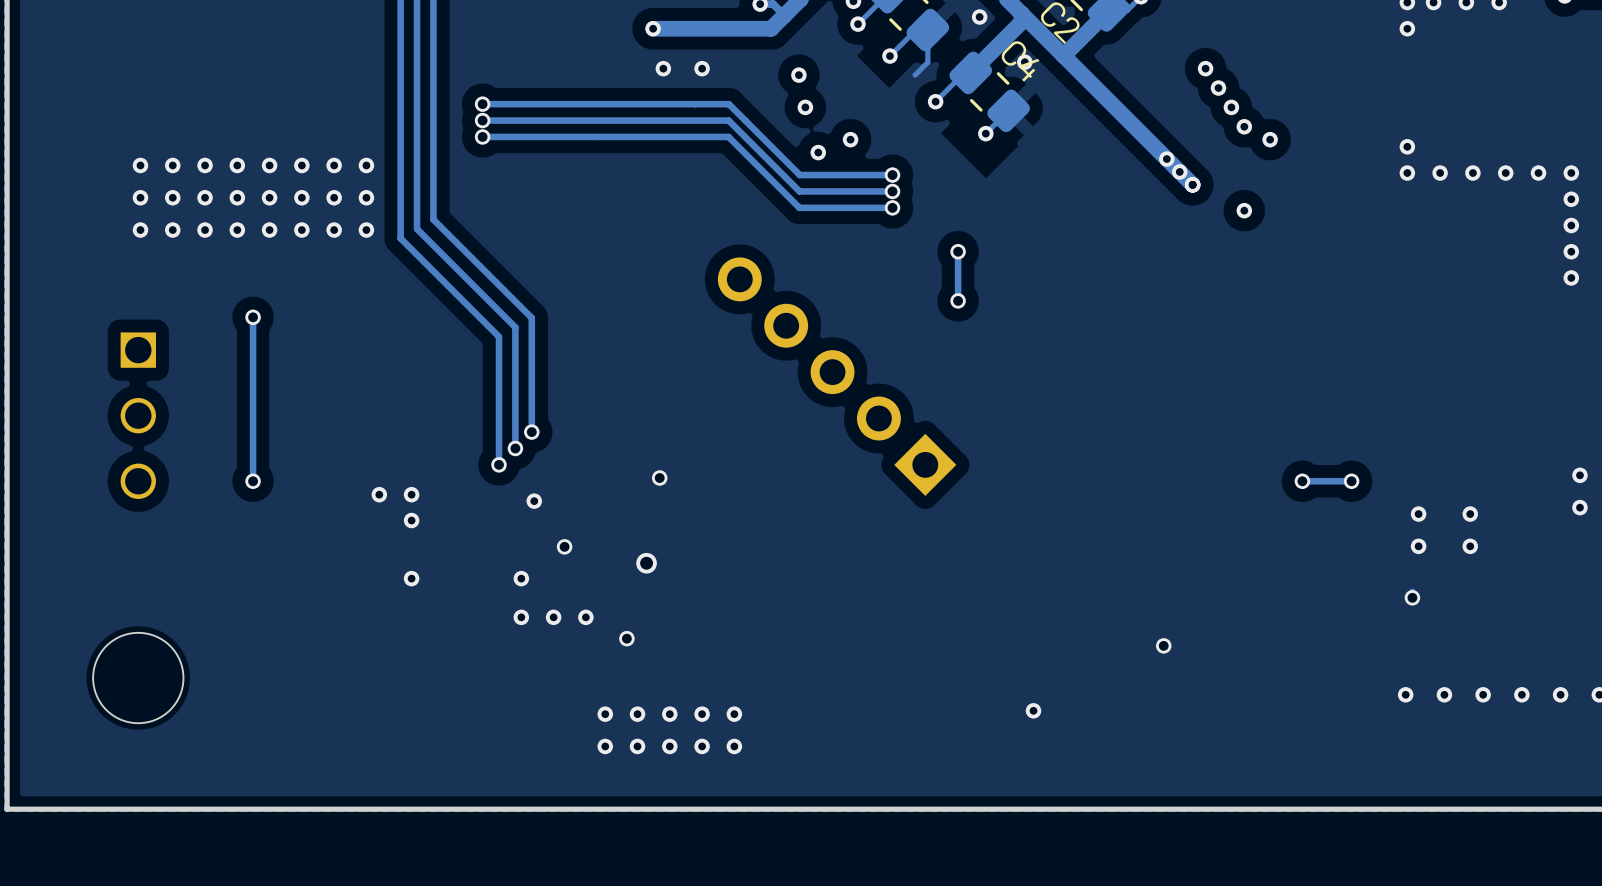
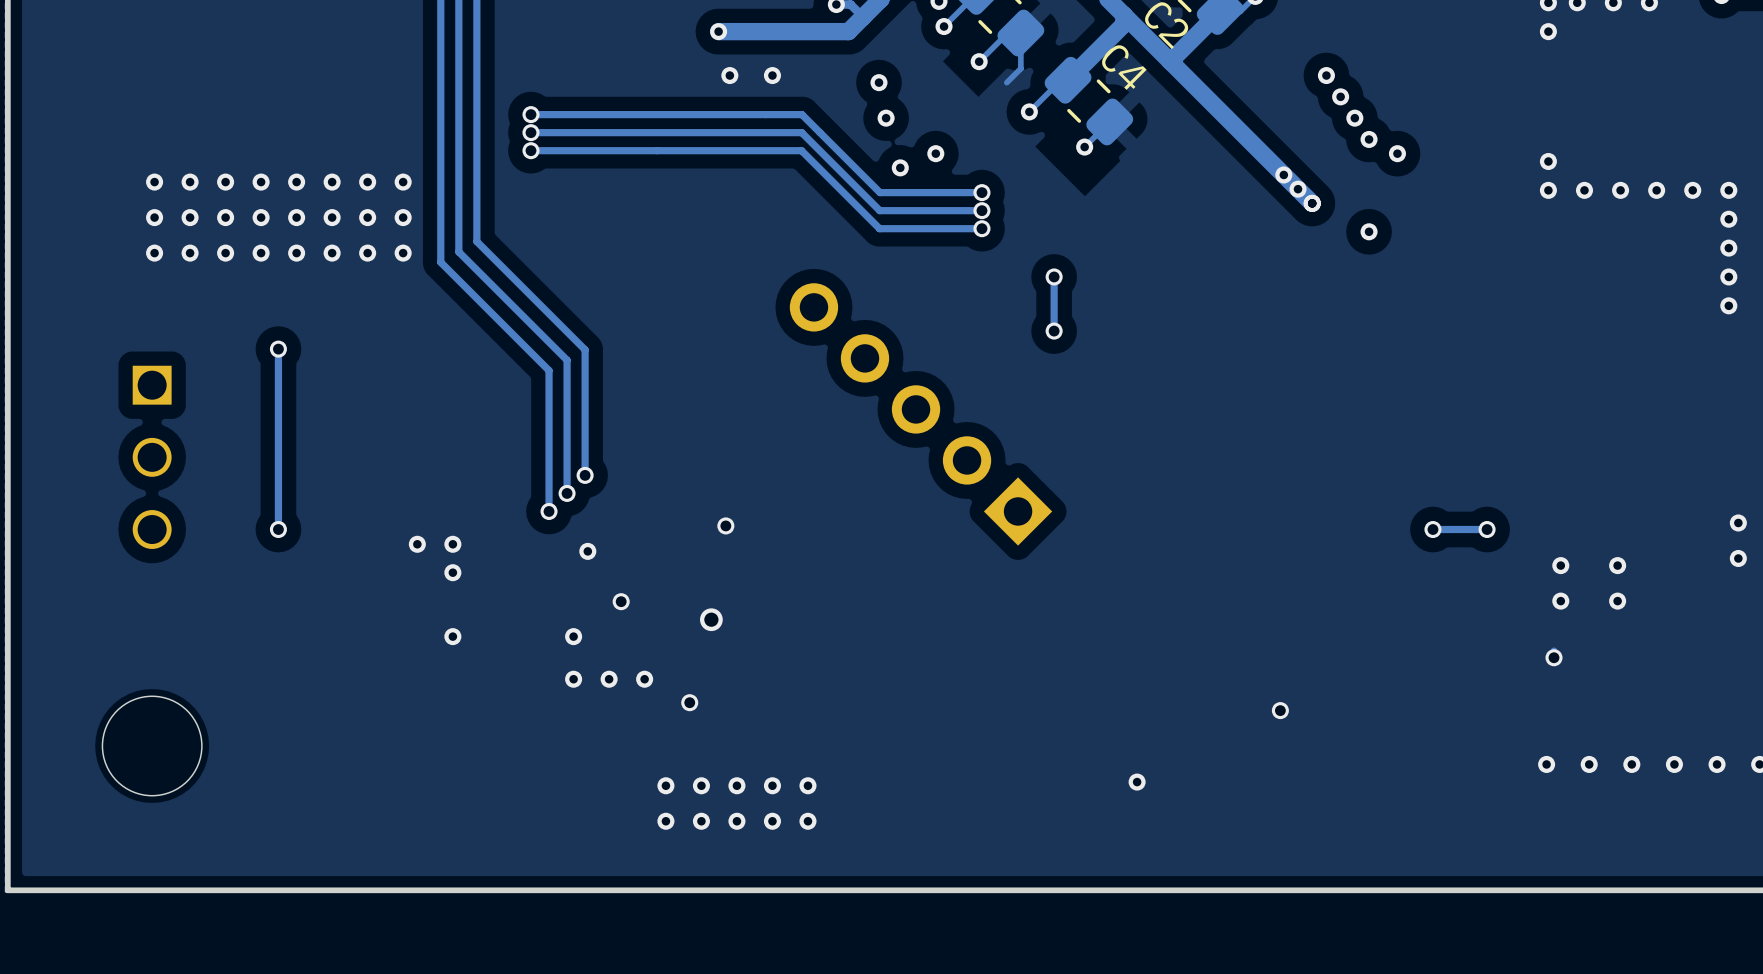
via: (979, 17) -> none
via: (1024, 62) -> none

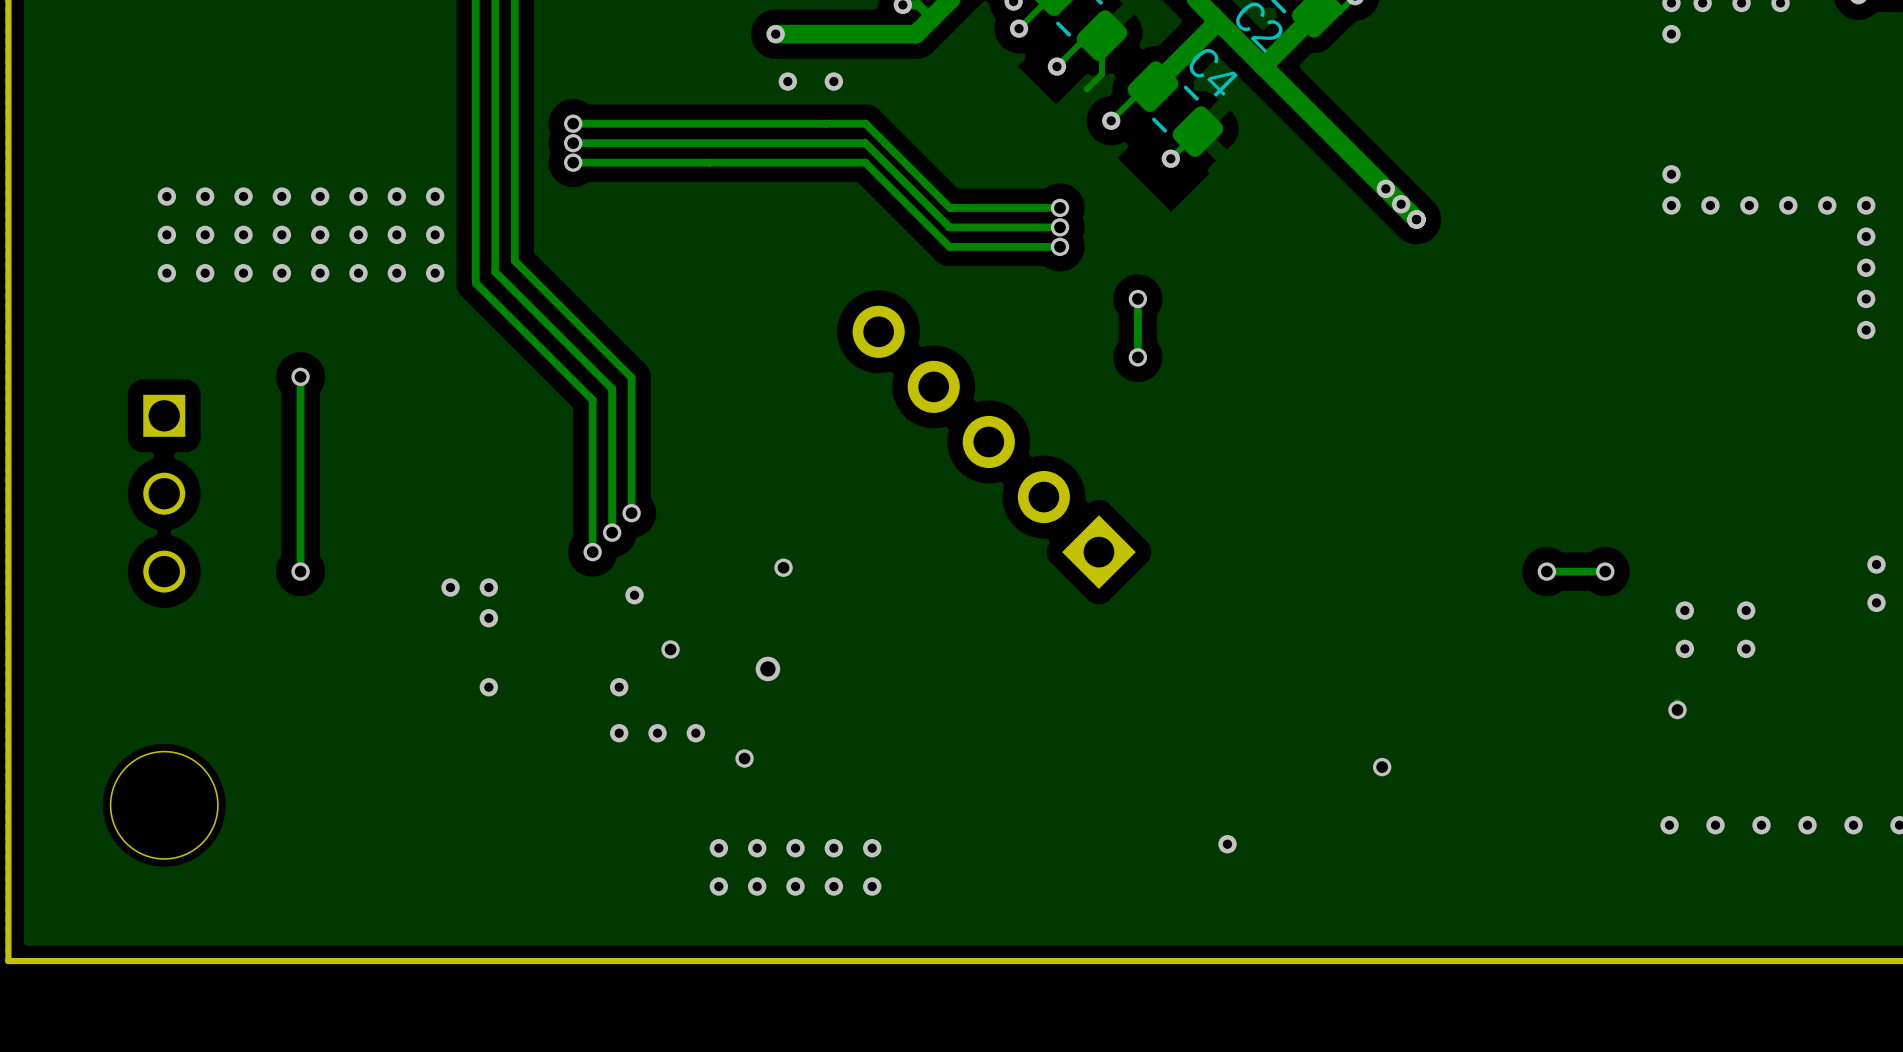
via: (1326, 75) -> none
via: (878, 82) -> none
via: (1340, 96) -> none
via: (886, 118) -> none
via: (1354, 118) -> none
via: (1369, 139) -> none
via: (935, 153) -> none
via: (1397, 153) -> none
via: (900, 167) -> none
via: (1369, 231) -> none

